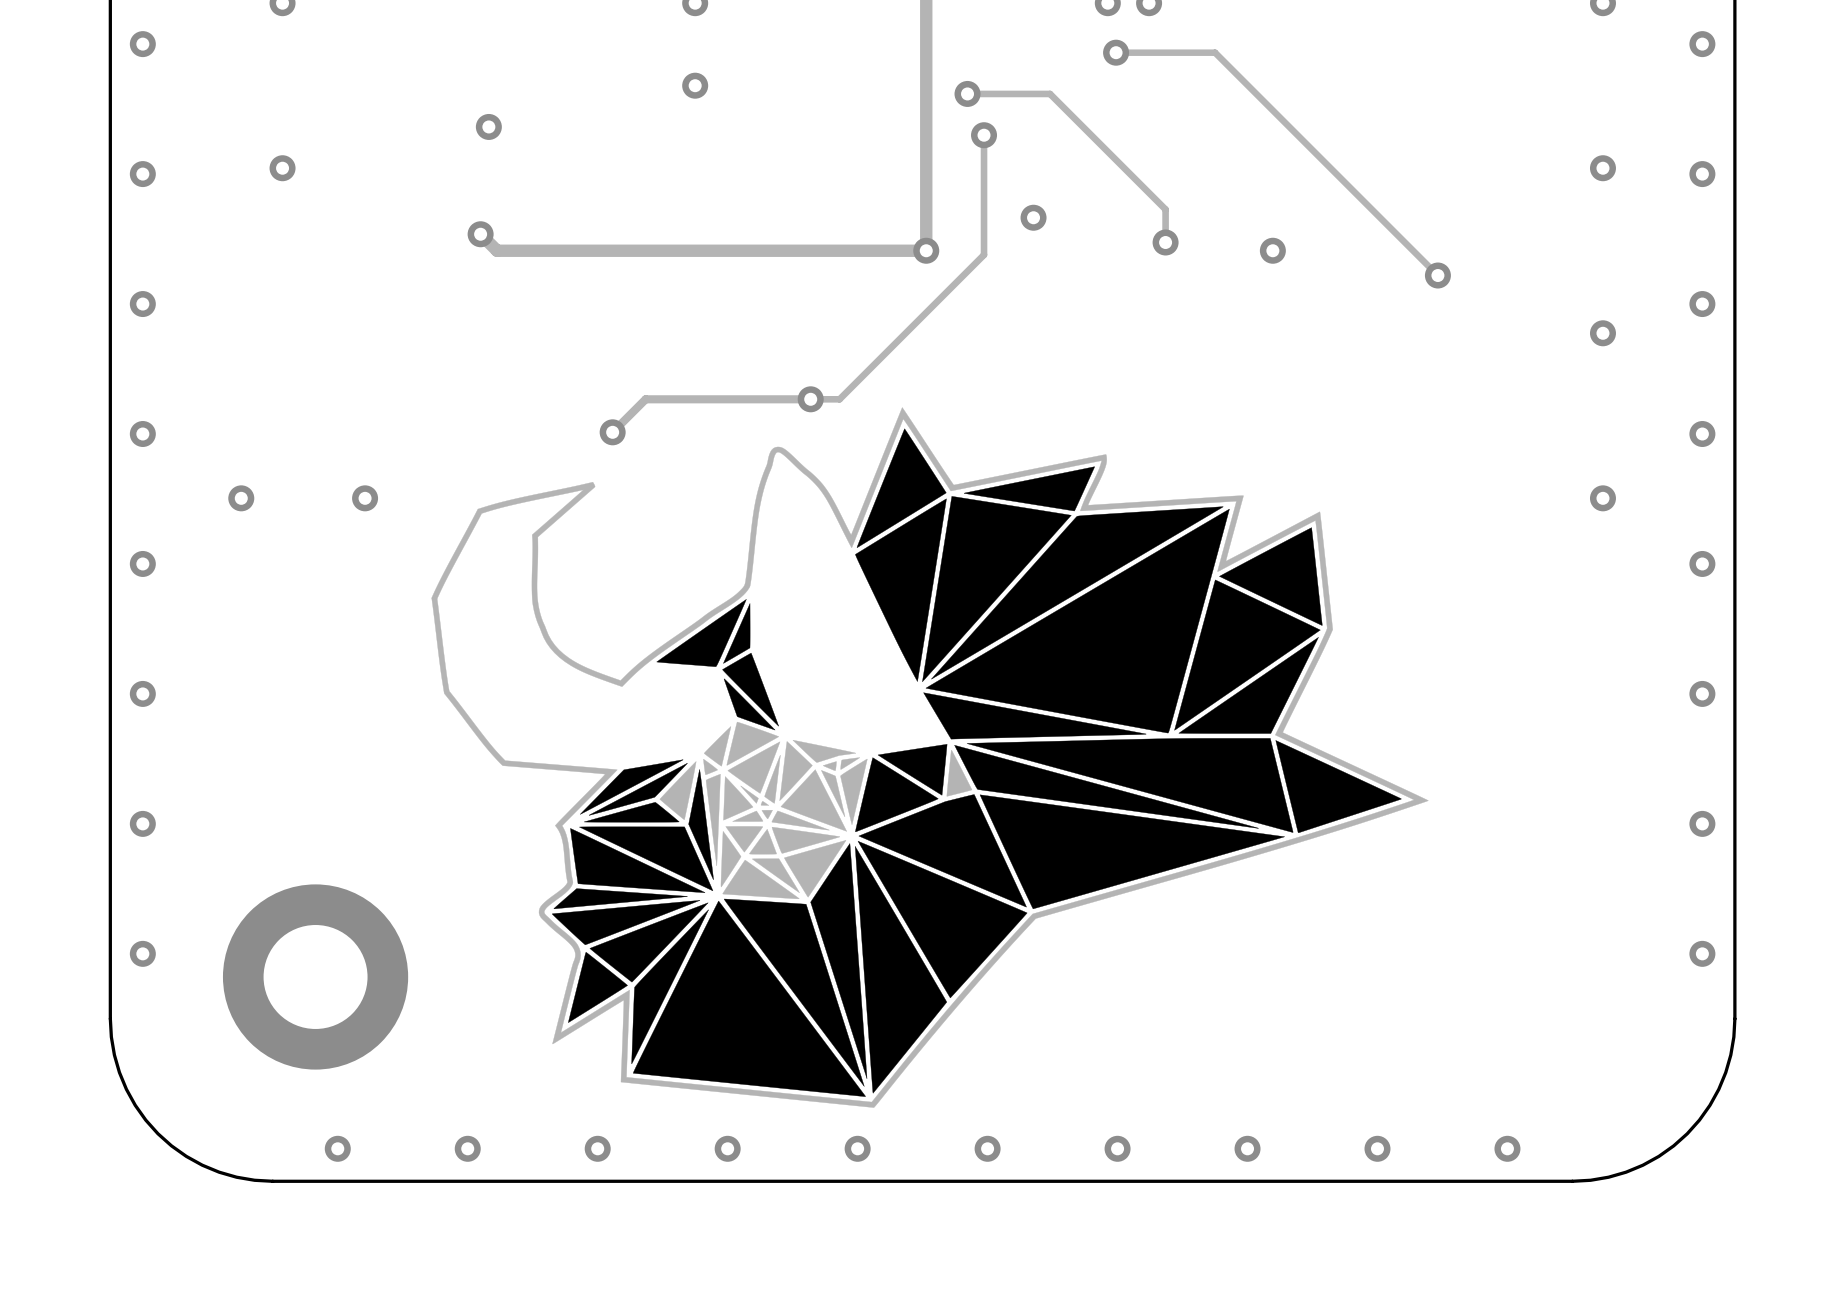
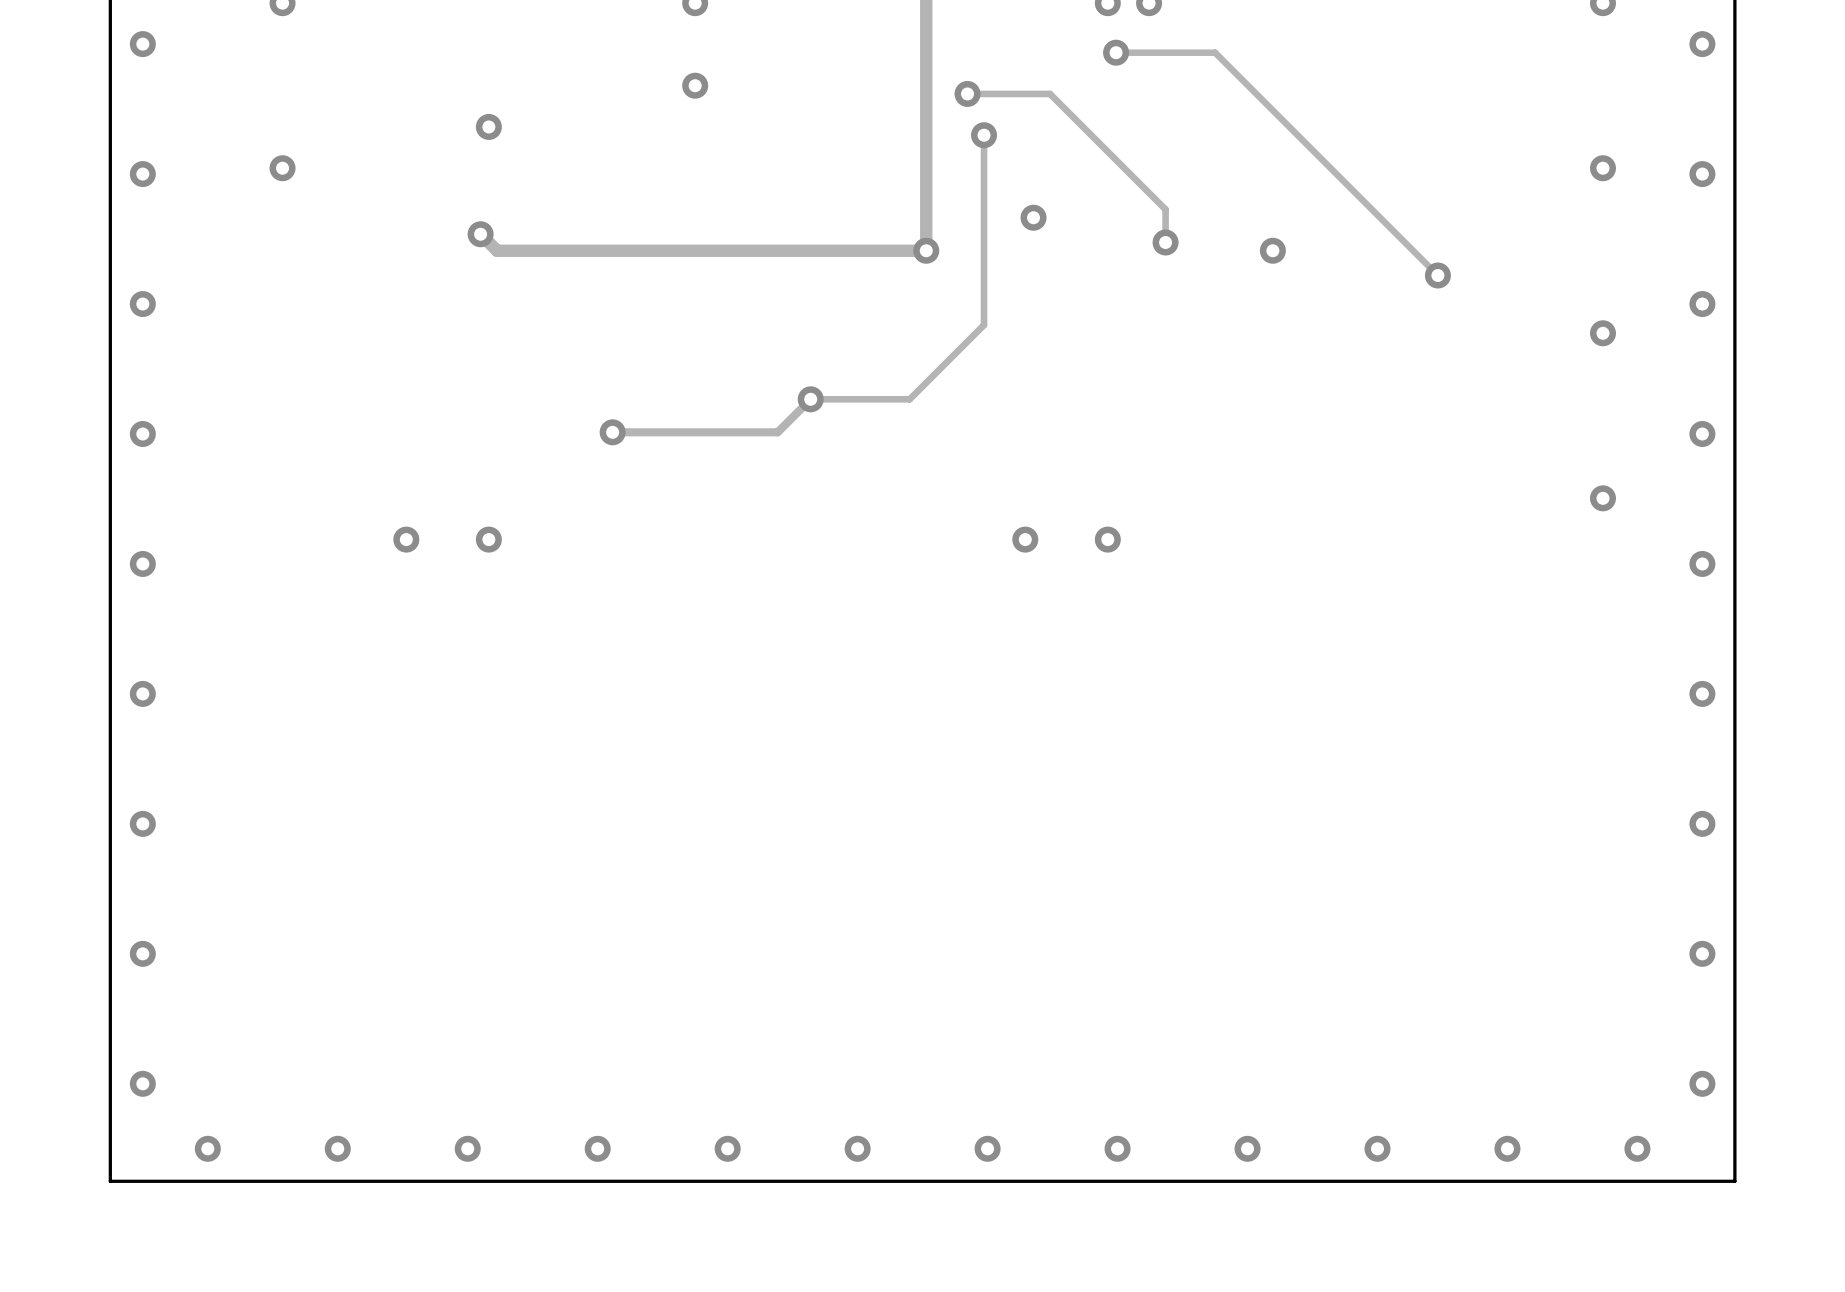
track: (984, 254) (839, 399) -> (984, 254) (984, 325) (909, 399) (839, 399)
track: (810, 399) (645, 399) (612, 432) -> (810, 399) (777, 432) (612, 432)
drawing: [431, 407, 1429, 1108] -> none
via: (241, 498) -> none
via position: (365, 498) -> (406, 539)
via: none -> (488, 539)
via: none -> (1025, 539)
via: none -> (1107, 539)
part: (315, 976) -> none
board edge: (110, 1018) (114, 1054) (126, 1089) (145, 1120) (157, 1133) (171, 1145) (202, 1165) (236, 1177) (272, 1181) -> (110, 1018) (110, 1181) (272, 1181)
board edge: (1734, 1018) (1730, 1054) (1718, 1089) (1709, 1105) (1687, 1133) (1658, 1156) (1626, 1172) (1590, 1180) (1572, 1181) -> (1734, 1018) (1734, 1181) (1572, 1181)
via: none -> (142, 1083)
via: none -> (1702, 1083)
via: none -> (207, 1148)
via: none -> (1637, 1148)

